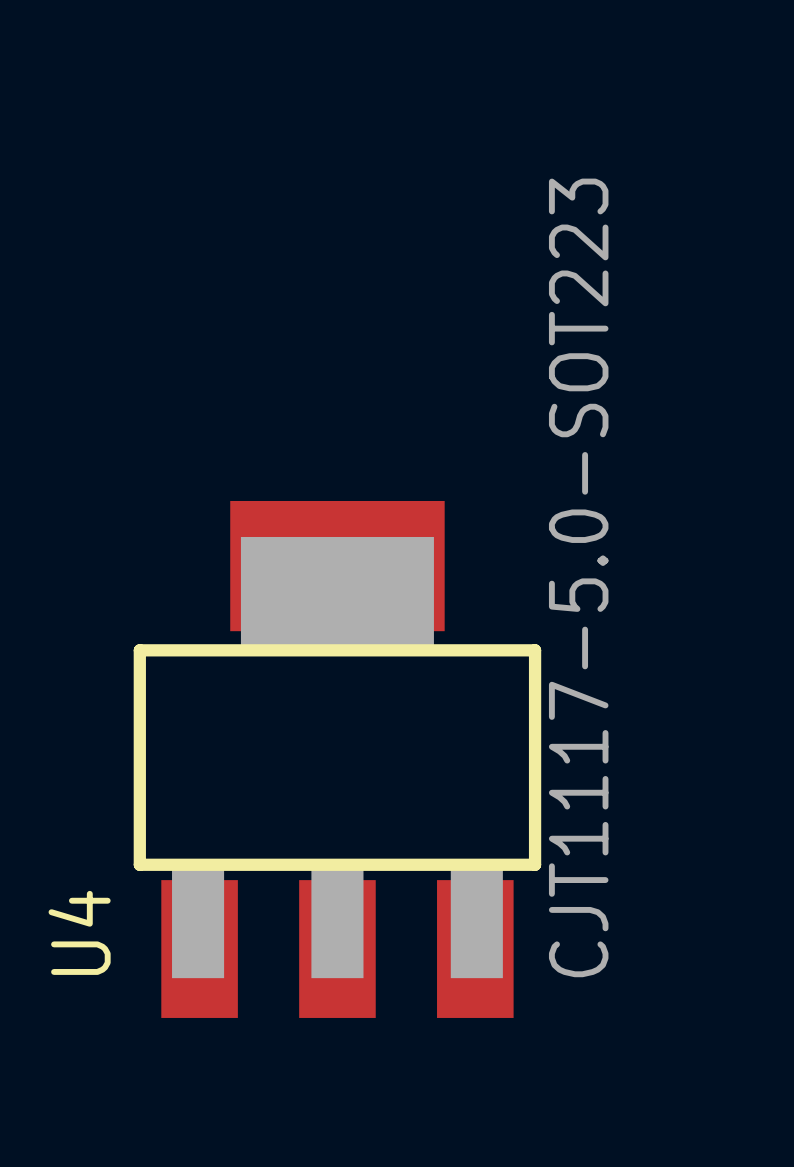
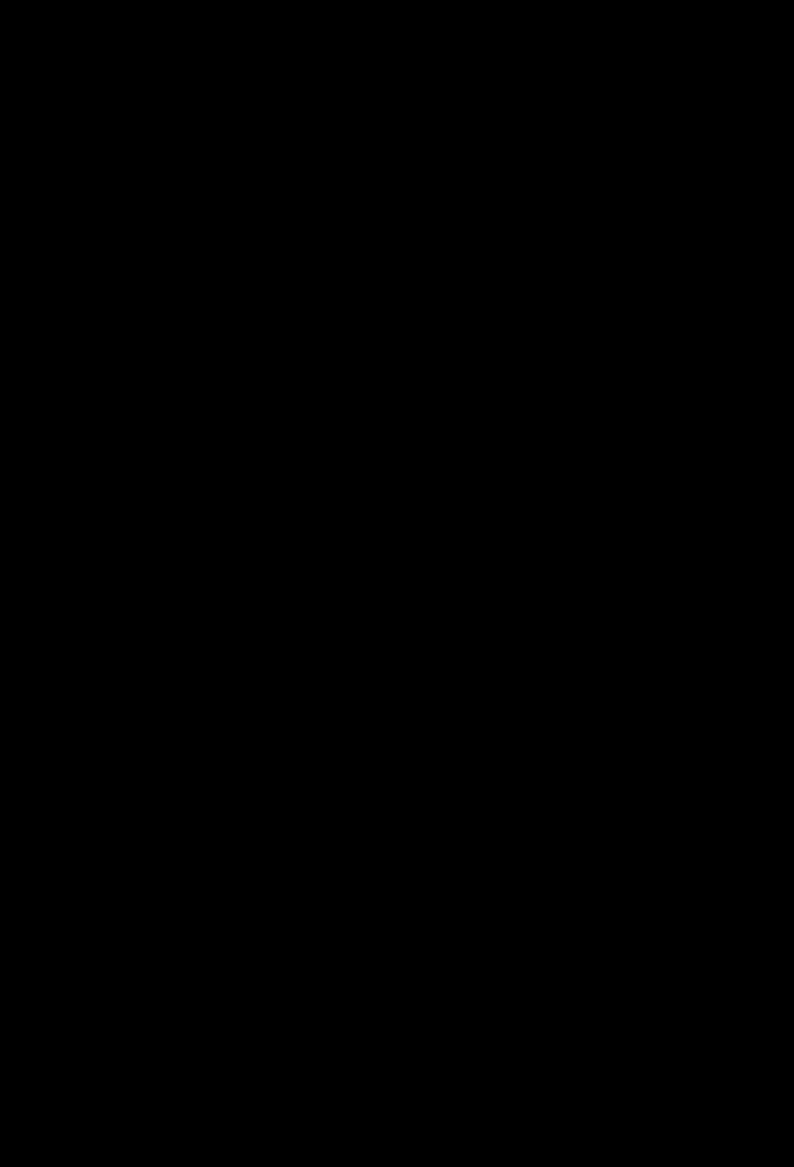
U4: CJT1117-5.0-SOT223 (337, 759) -> none

